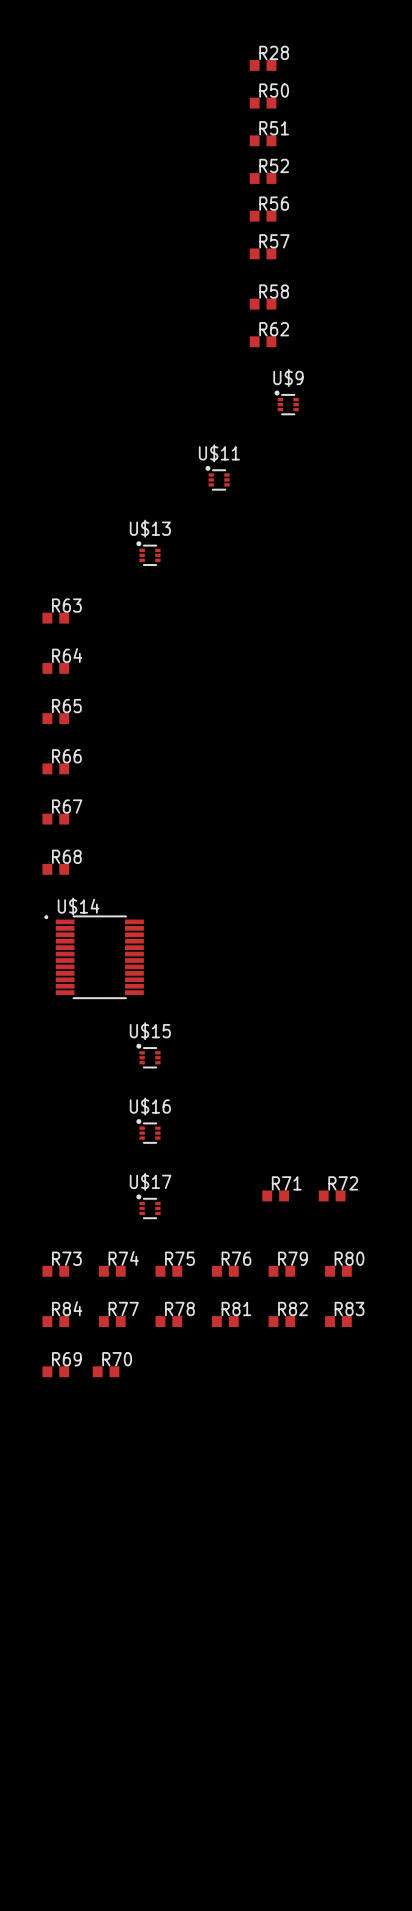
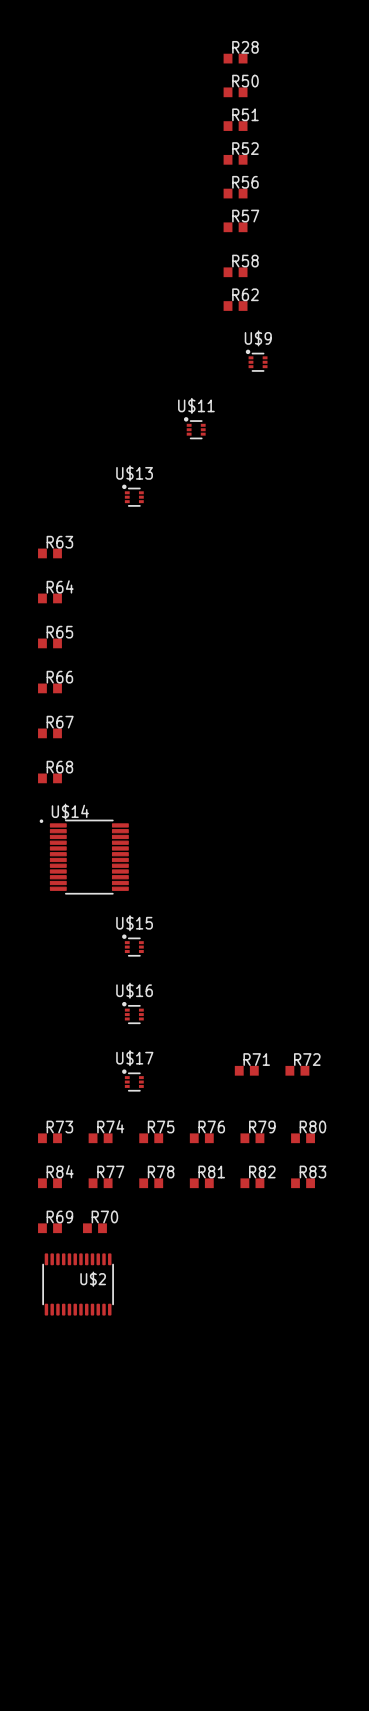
U$2: none -> (78, 1284)

